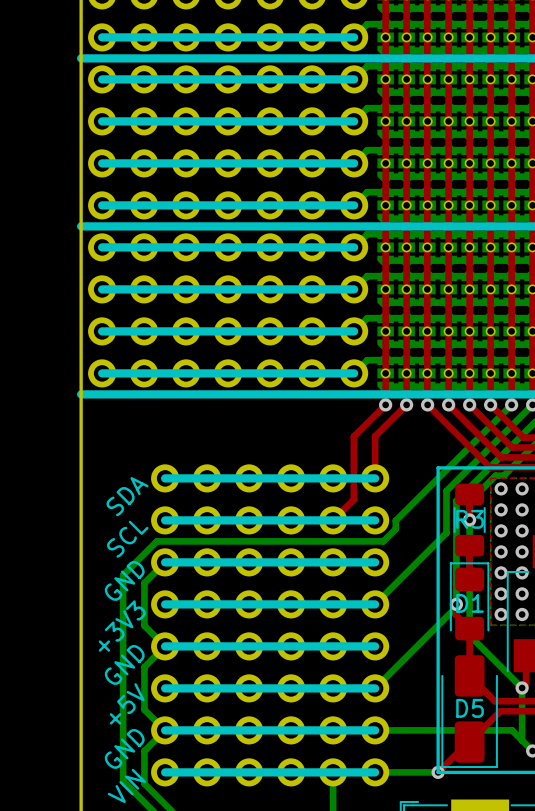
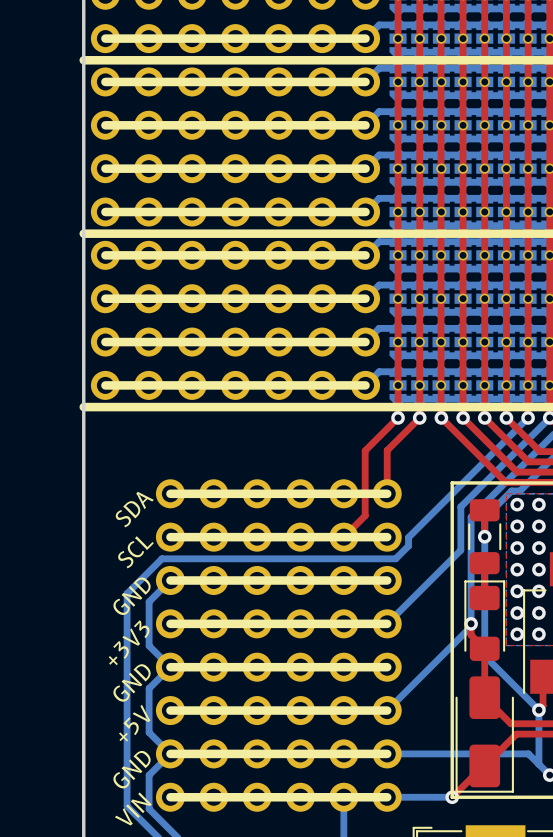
R3 name: R3 (470, 519) -> none
D1 name: D1 (470, 603) -> none
D5 name: D5 (470, 708) -> none

